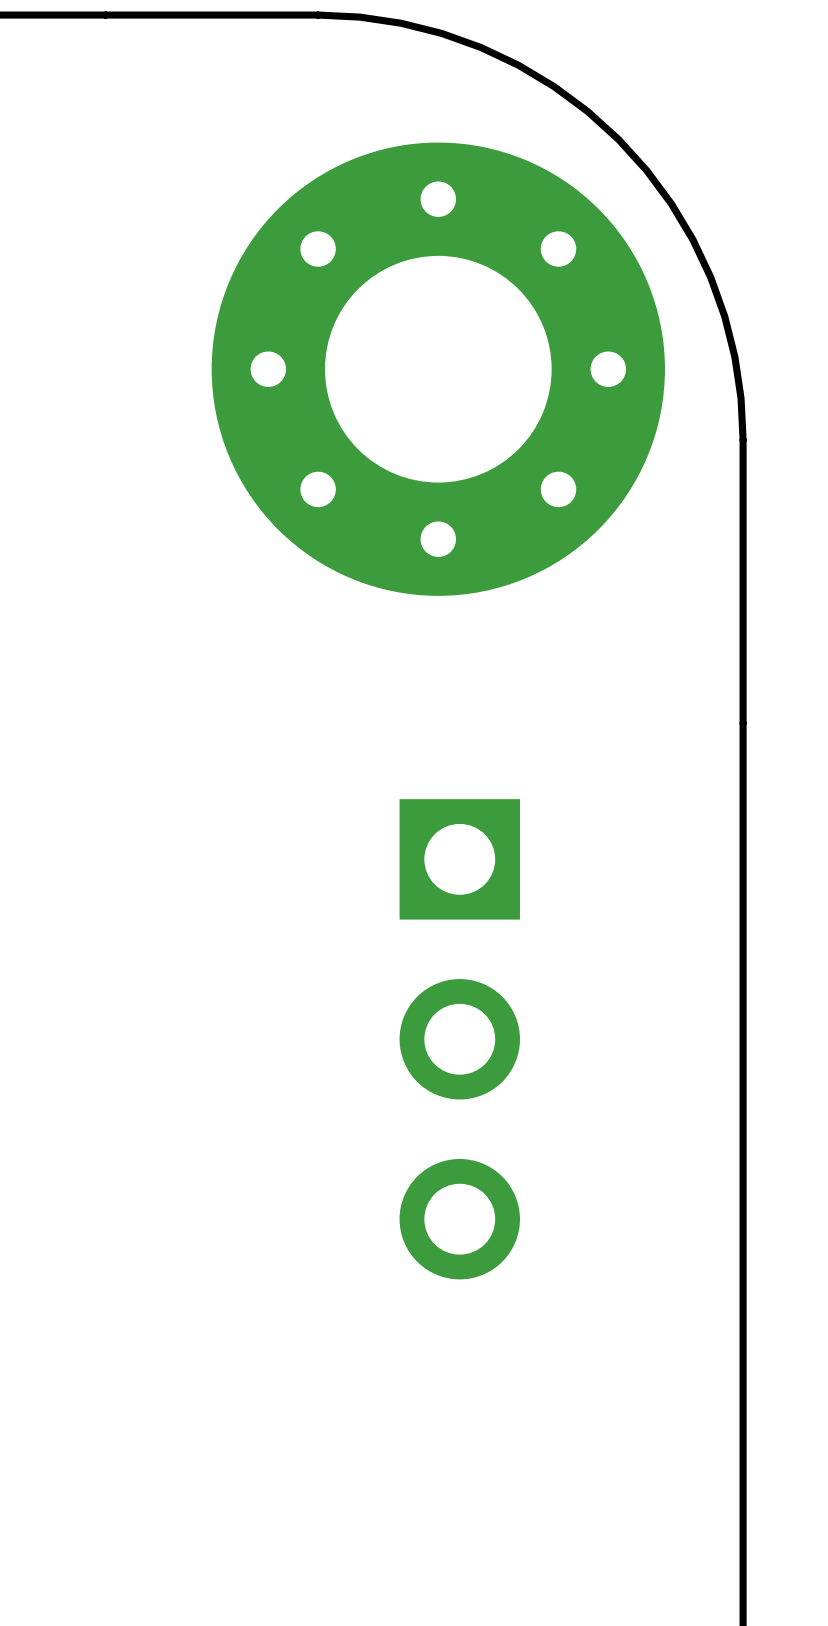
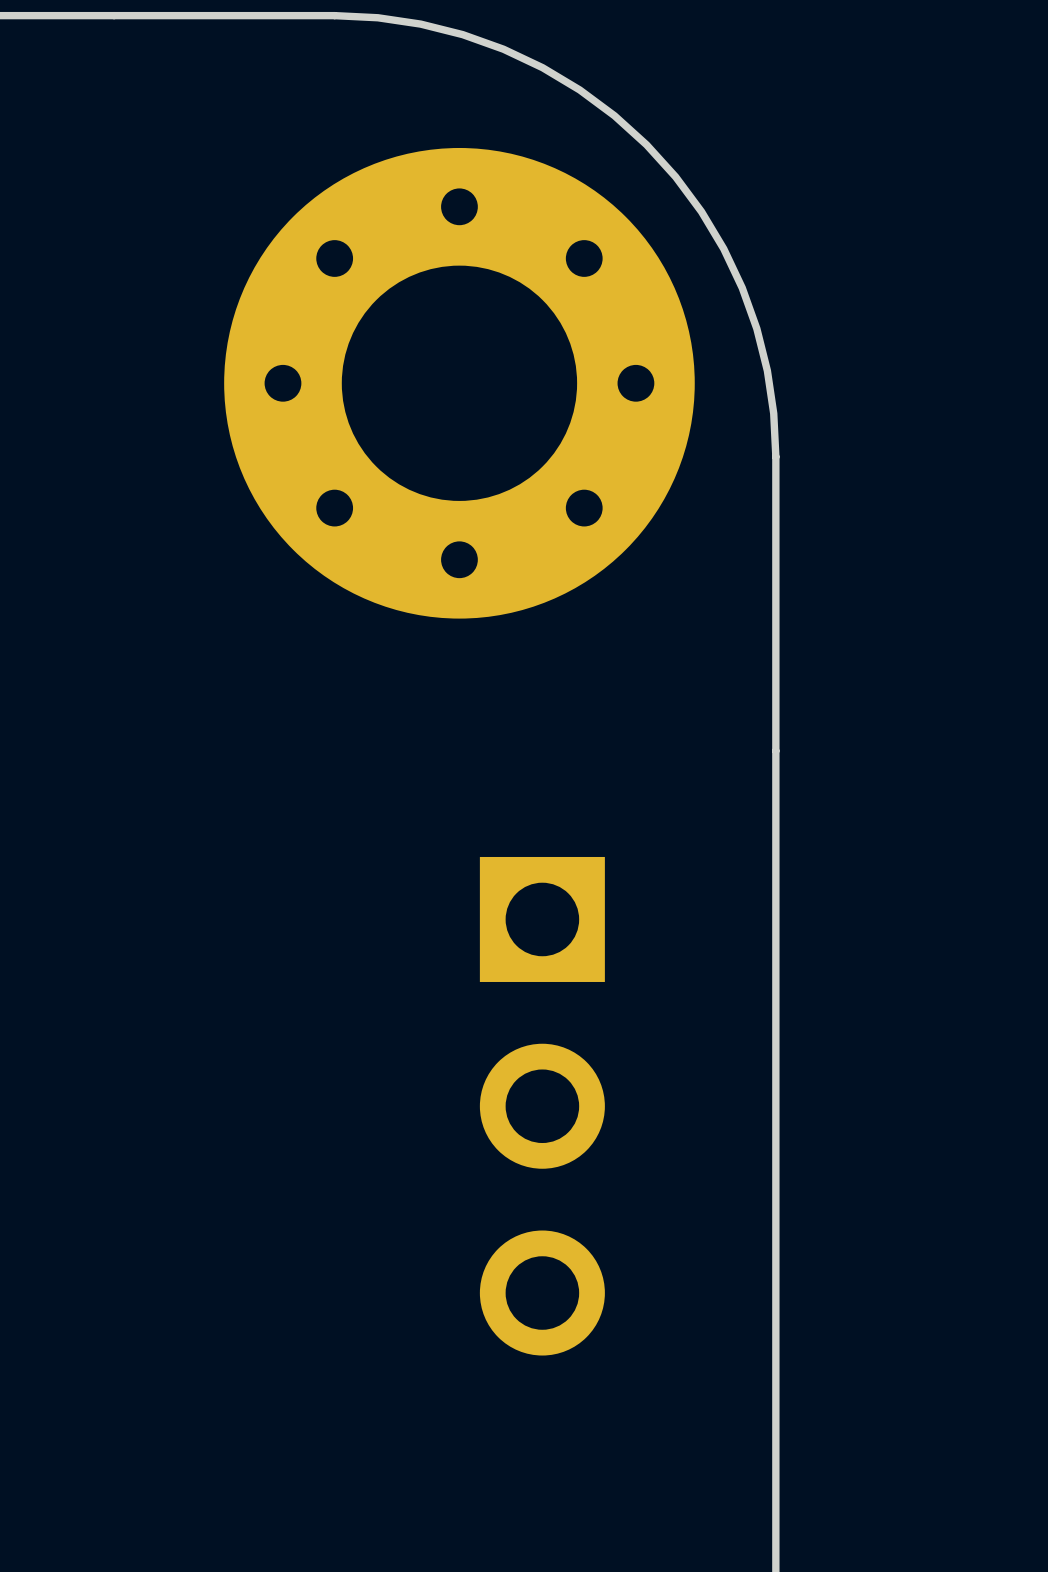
part position: (459, 1039) -> (542, 1106)

